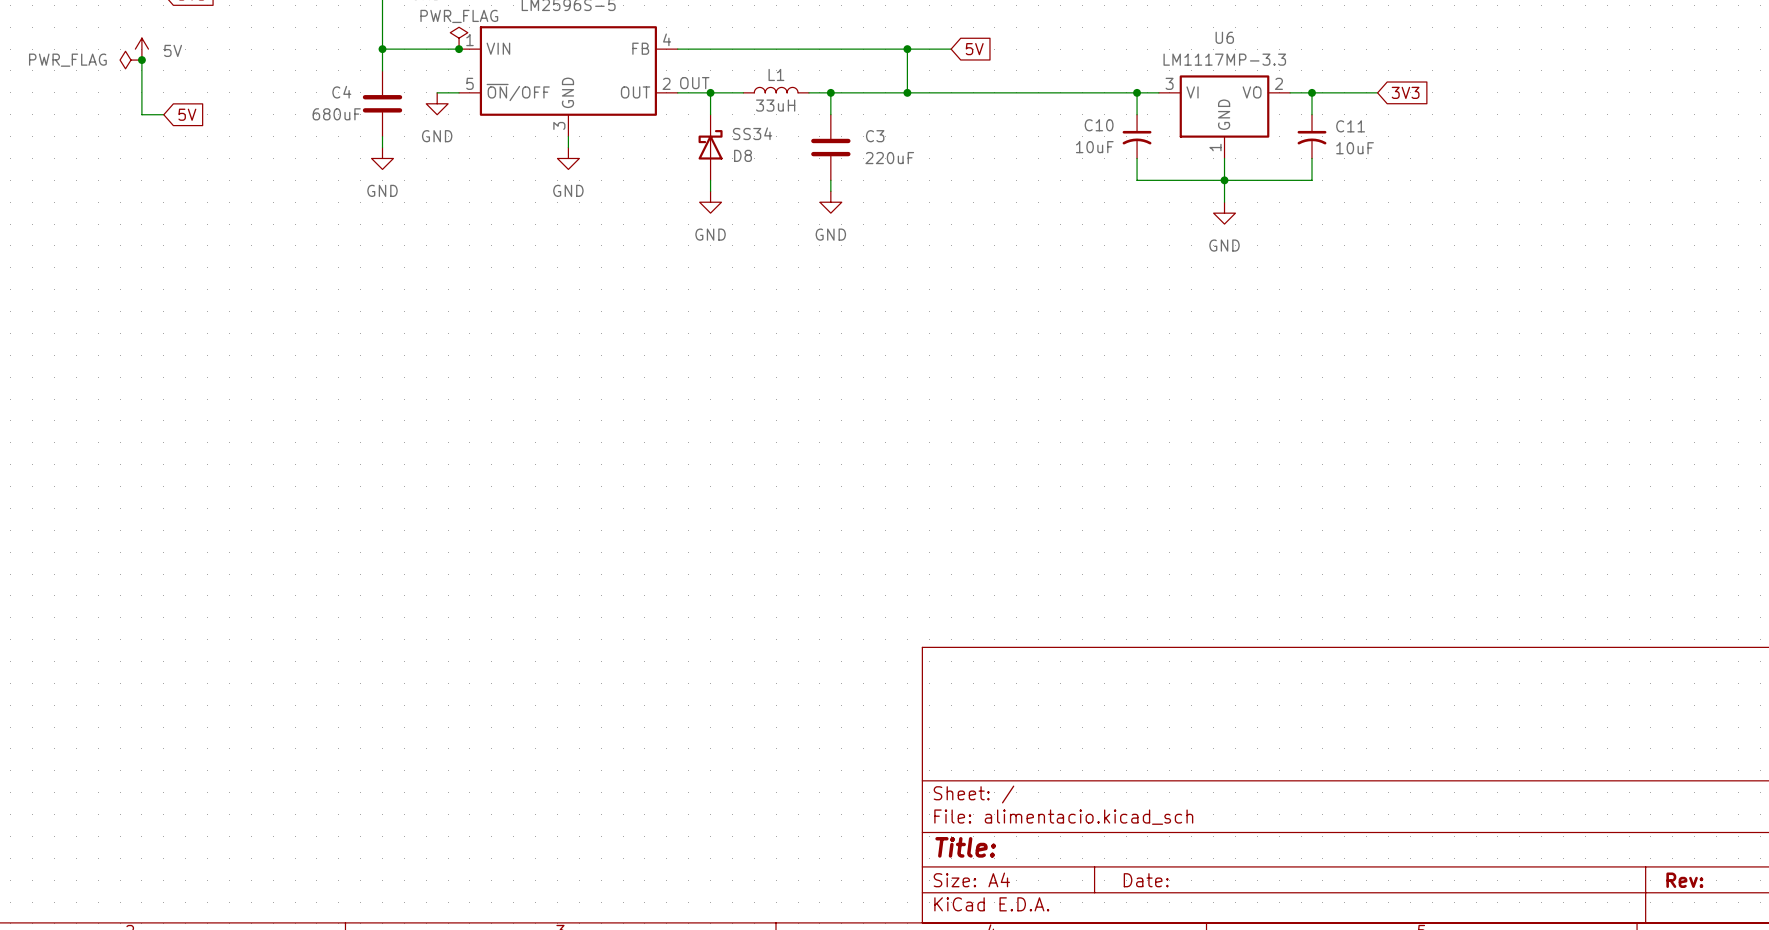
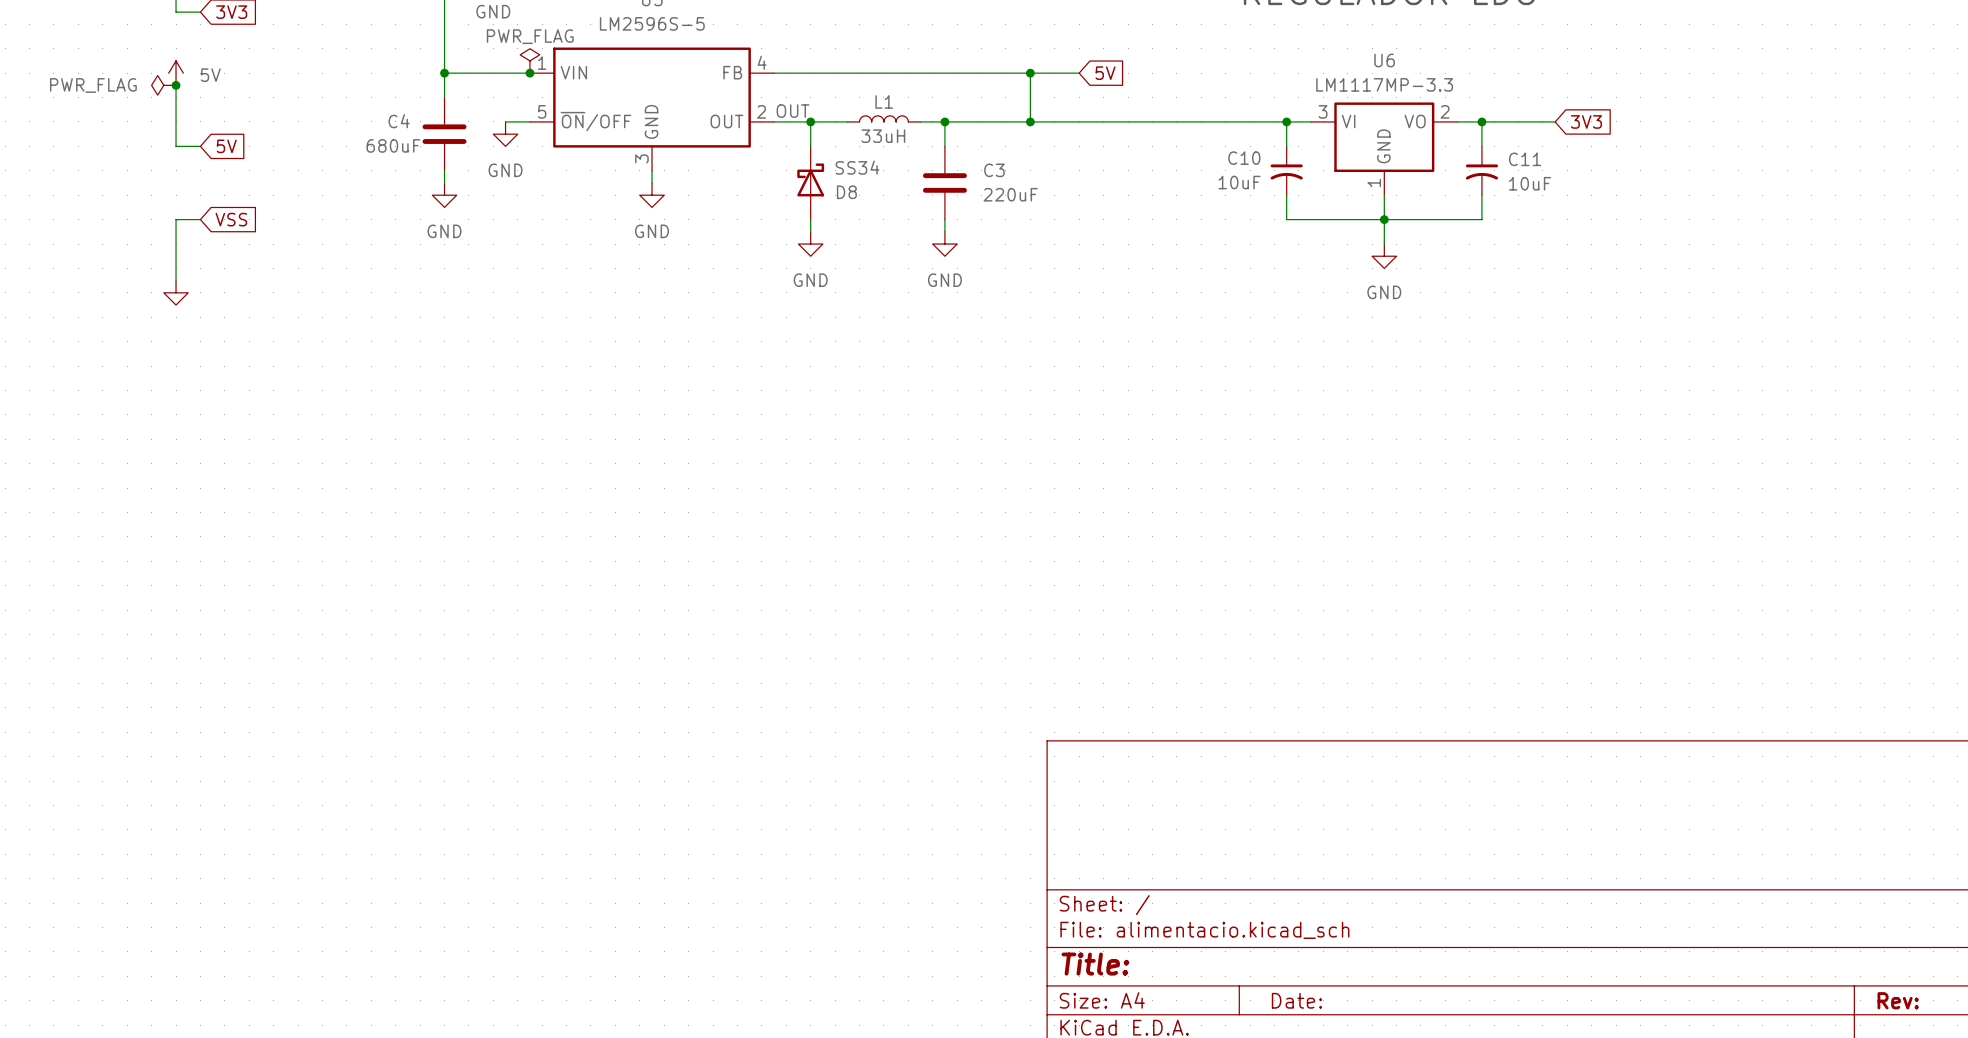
wire: none -> (200, 219) (176, 219) (176, 280)
global label: none -> VSS (231, 219)
power symbol: none -> (176, 292)

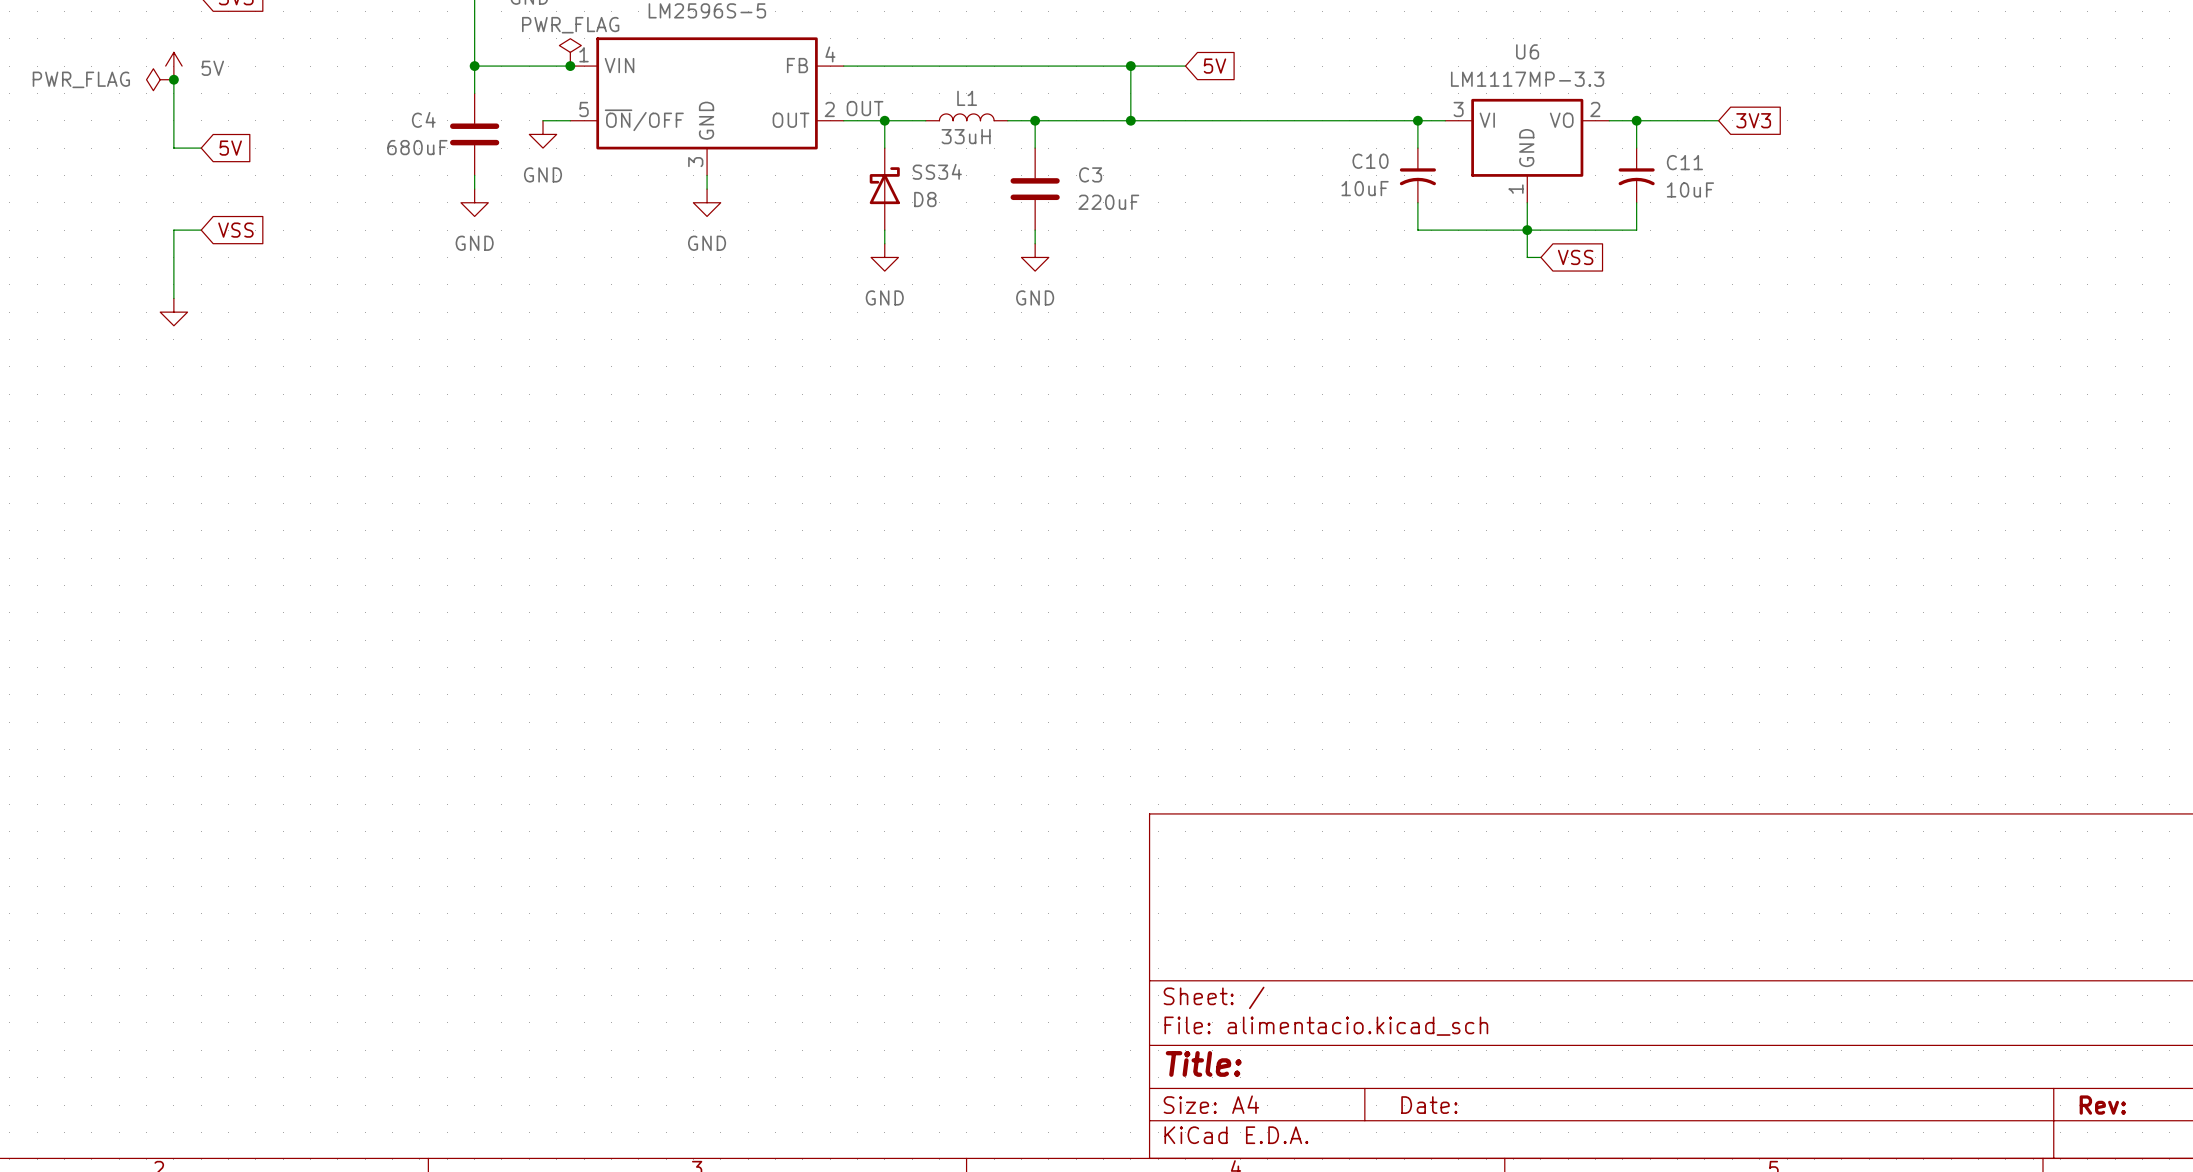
wire: none -> (1527, 257) (1540, 257)
global label: none -> VSS (1575, 257)
power symbol: GND (1384, 256) -> none

